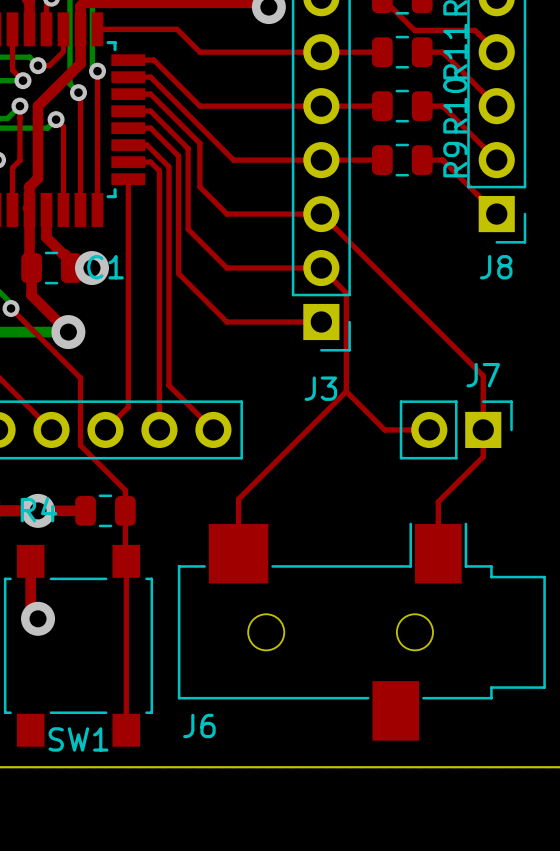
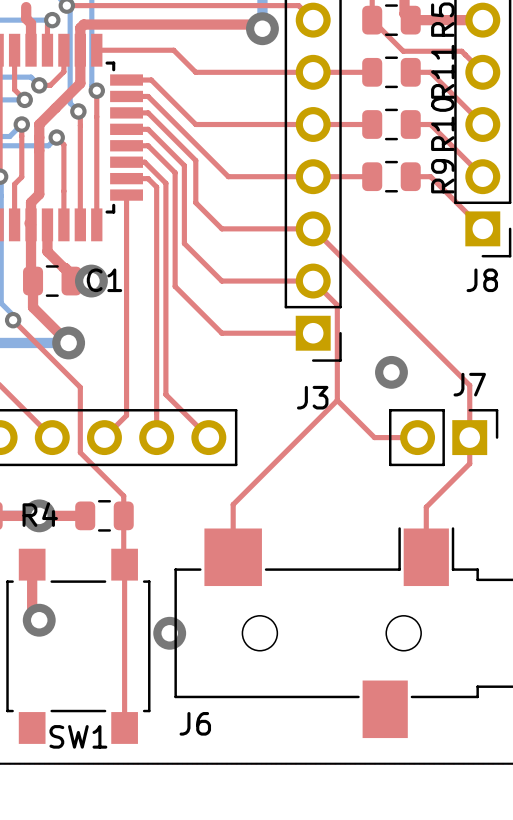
via: none -> (391, 372)
via: none -> (169, 633)

